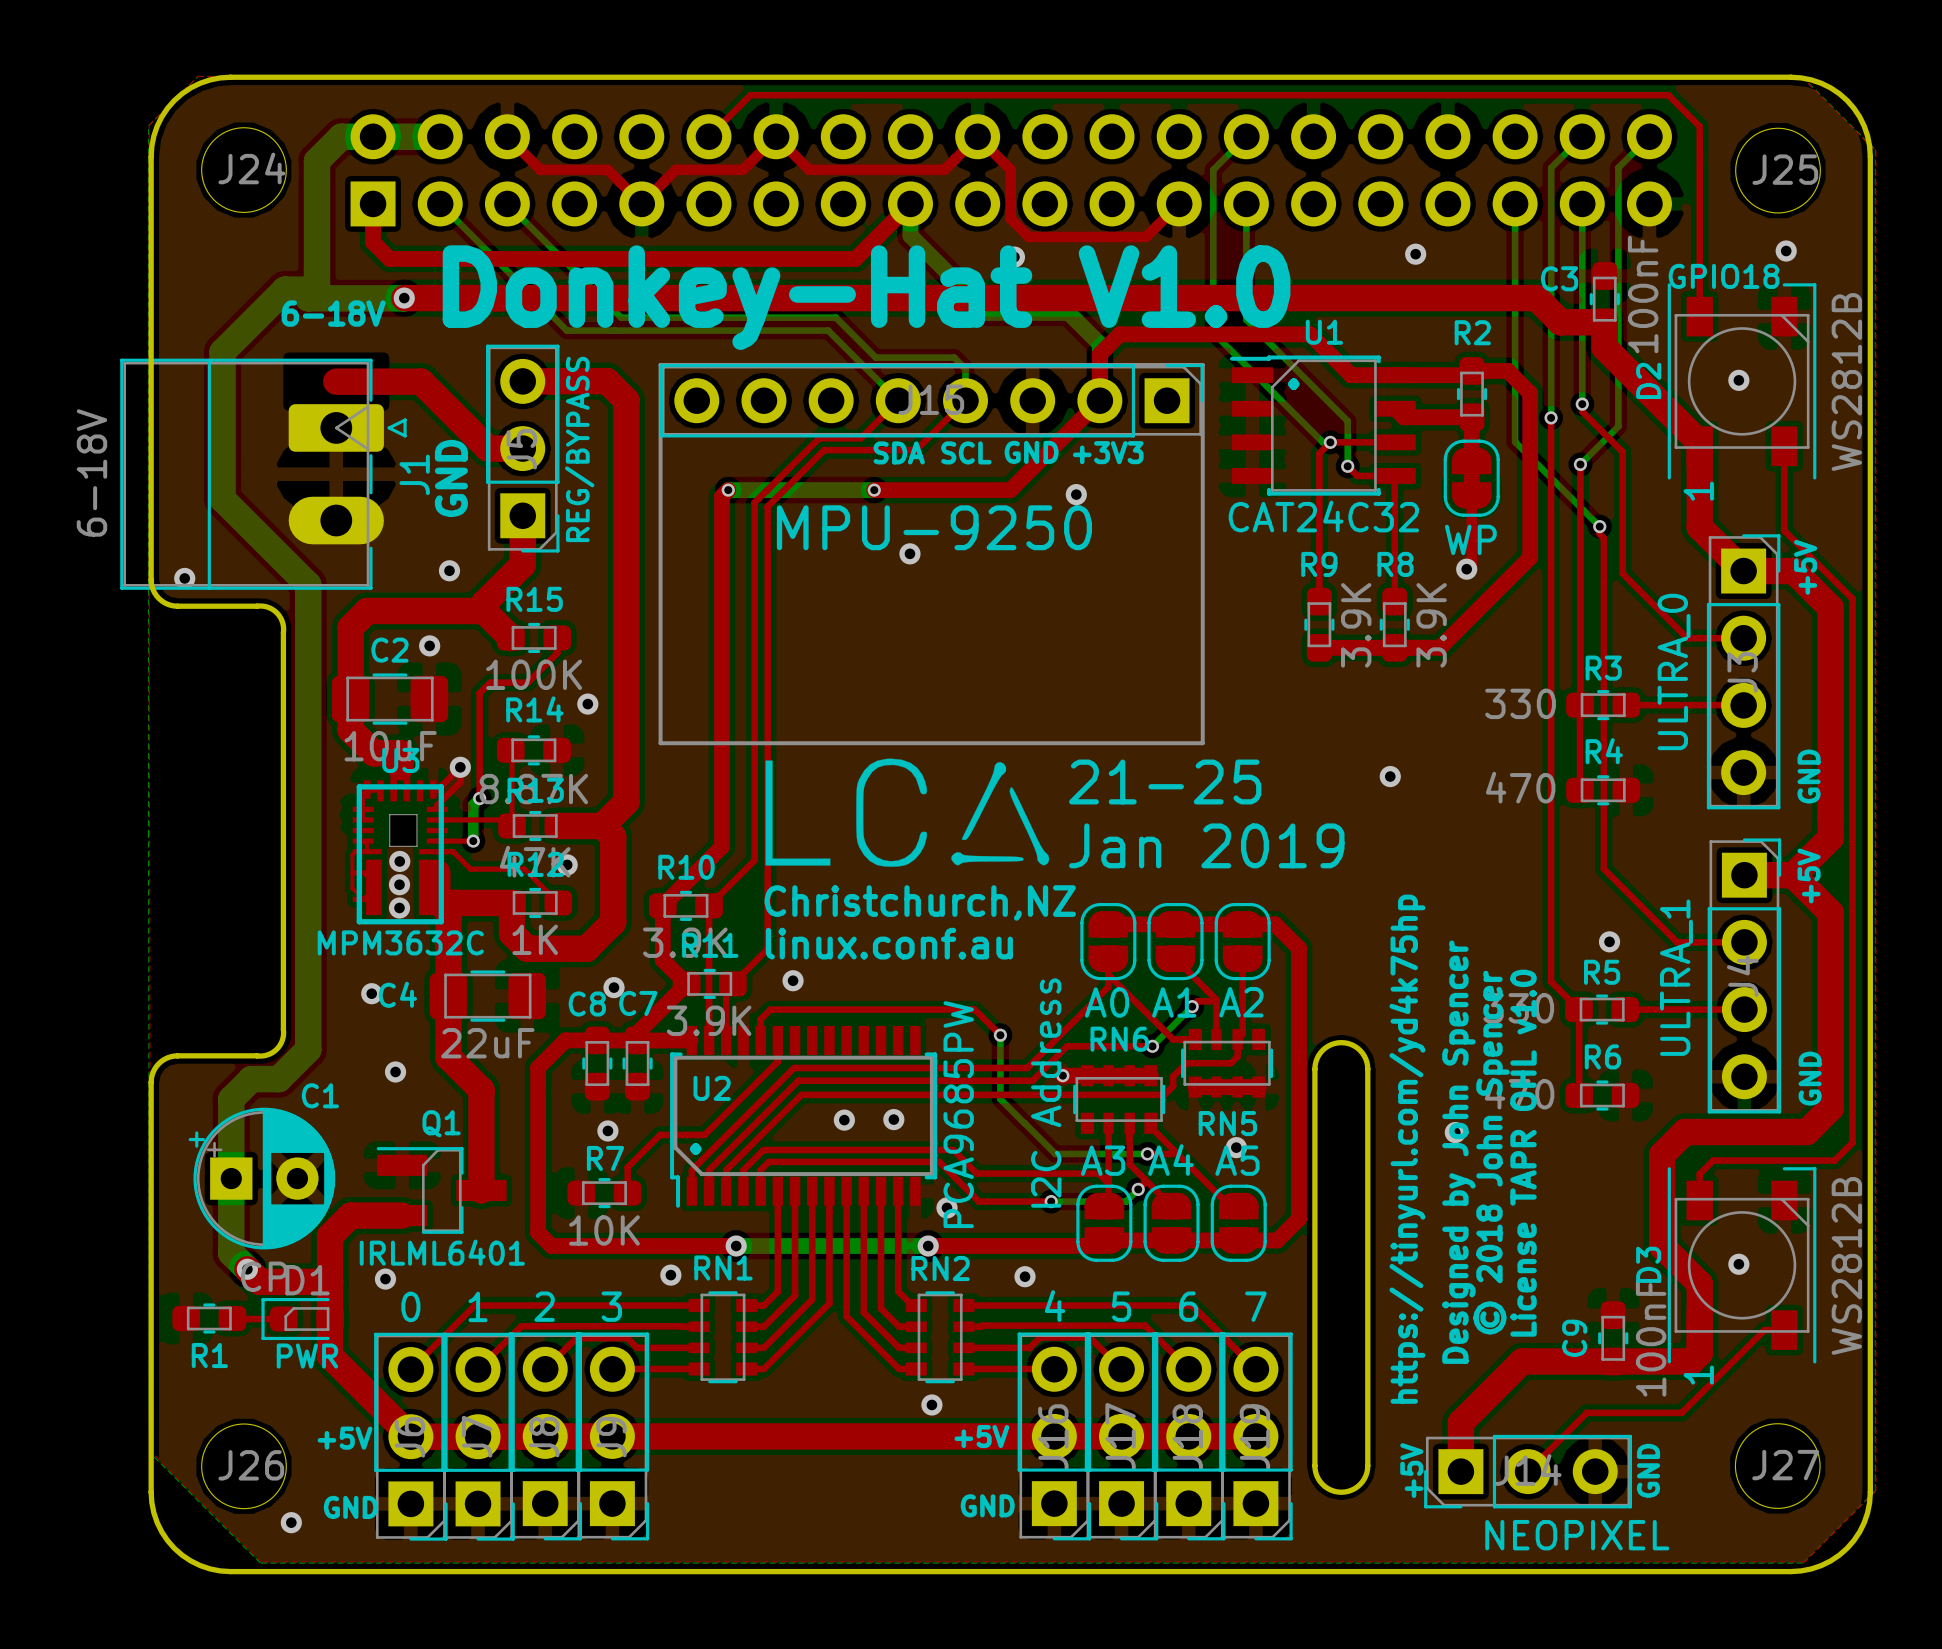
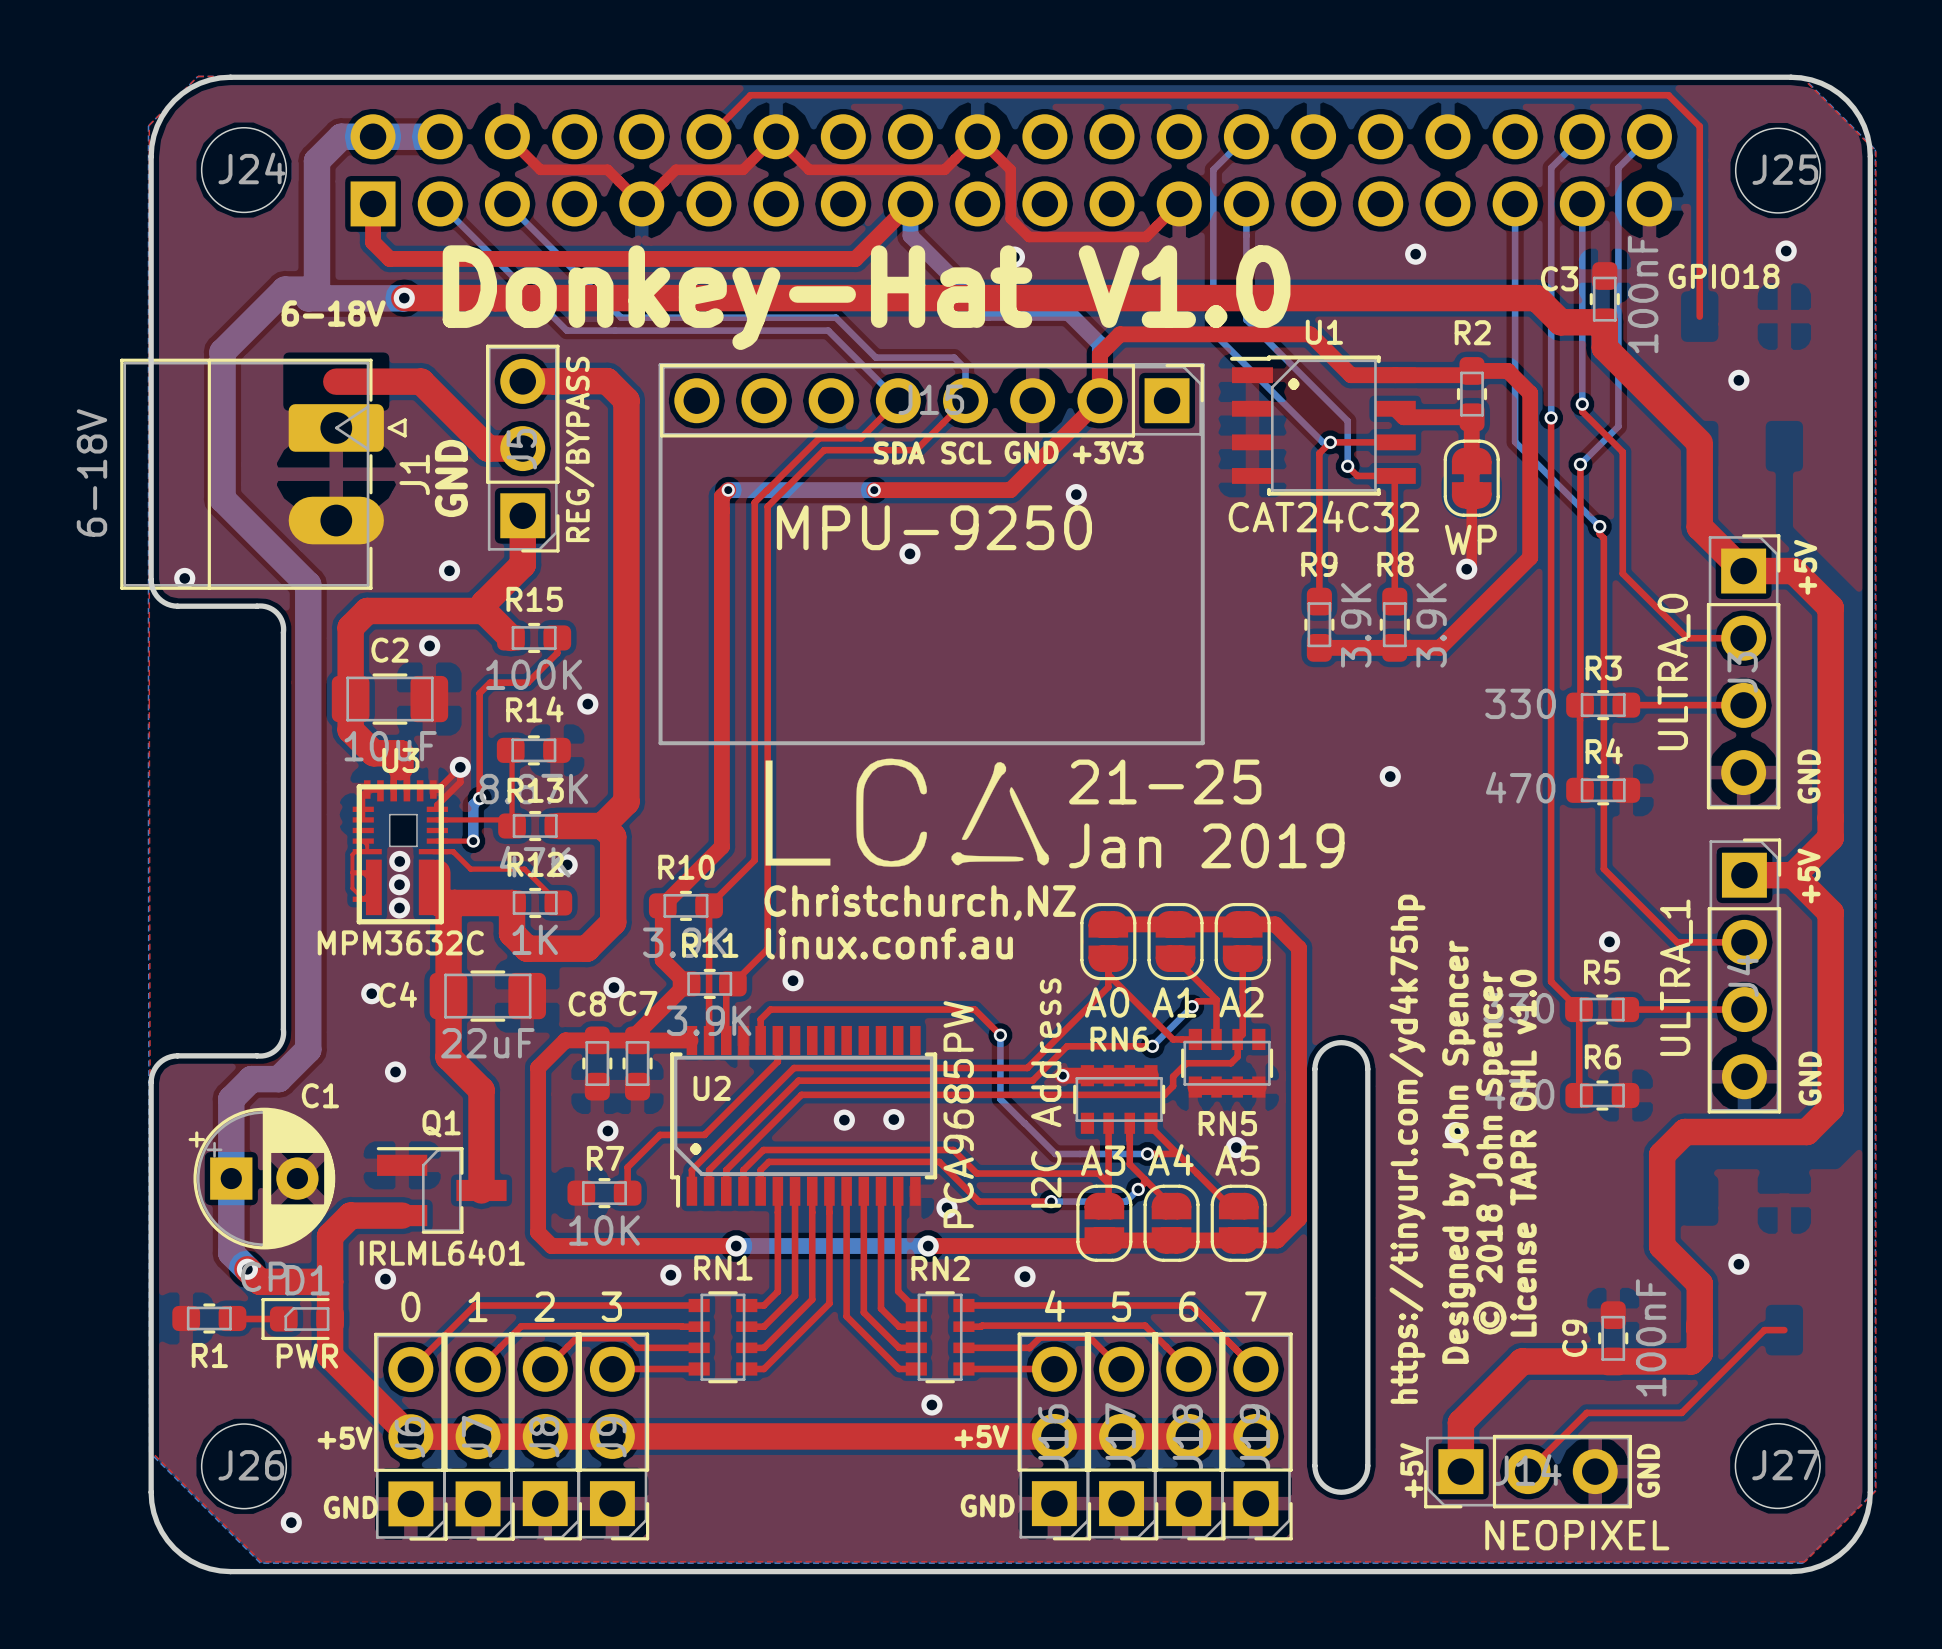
D2: WS2812B (1742, 381) -> none
top track: (1784, 446) (1784, 530) (1852, 598) (1852, 1142) (1834, 1160) (1713, 1160) (1699, 1174) (1699, 1200) -> none
D3: WS2812B (1742, 1265) -> none

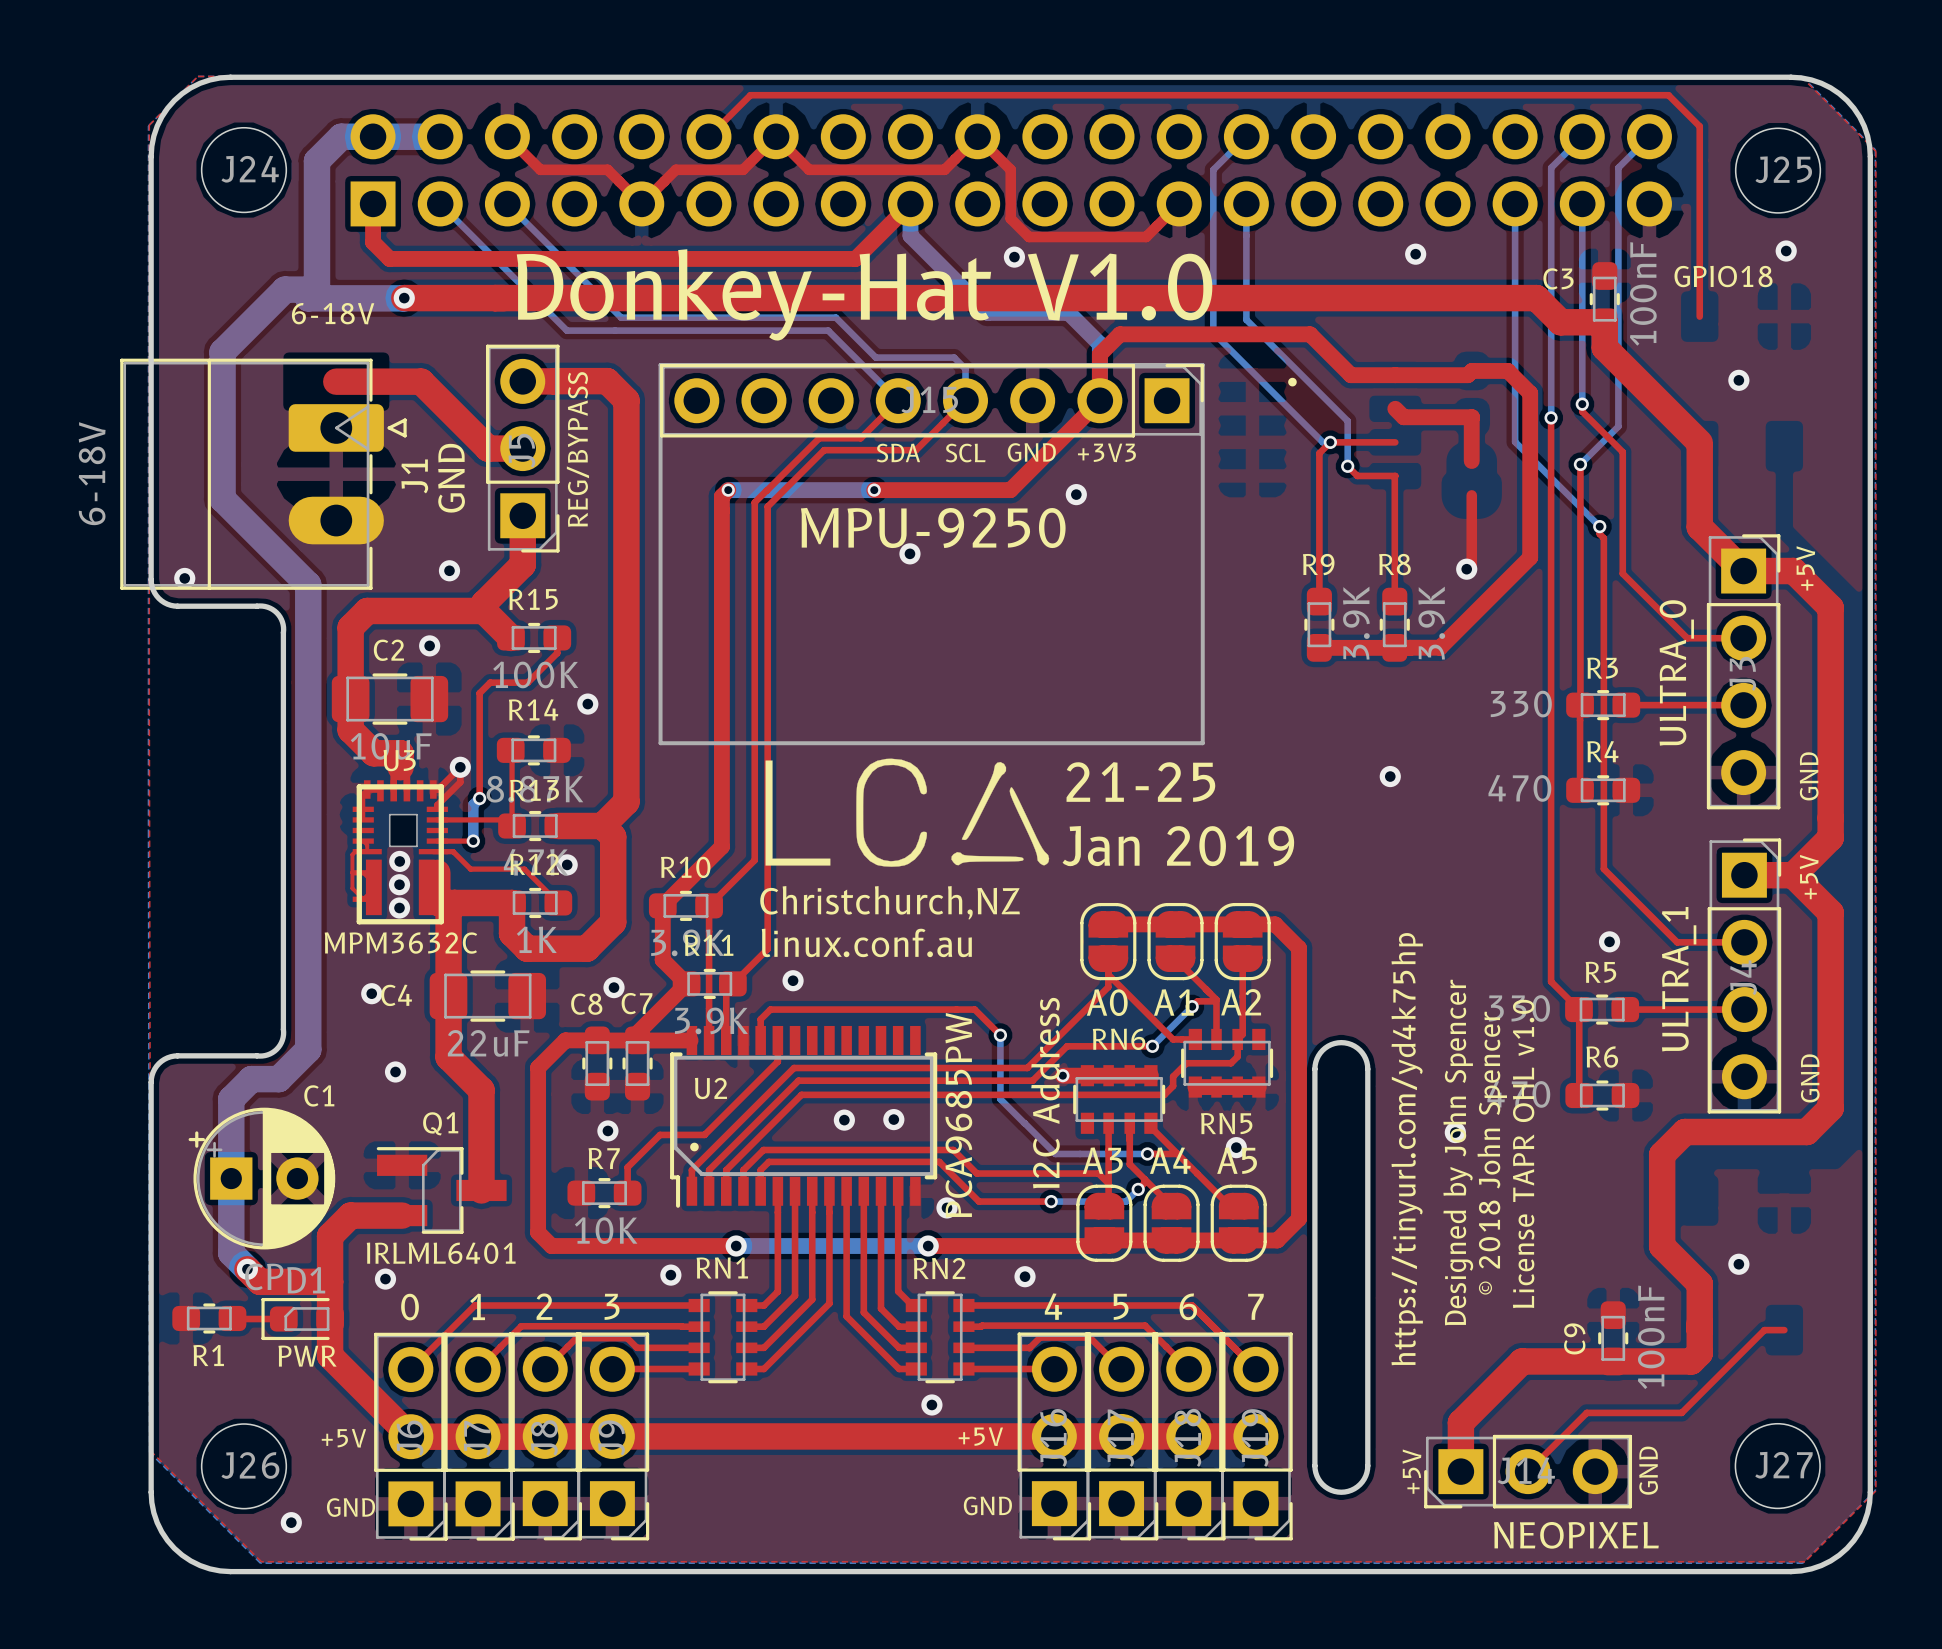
R2: (1472, 394) -> none
U1: CAT24C32 (1322, 425) -> none
part: WP (1471, 478) -> none

